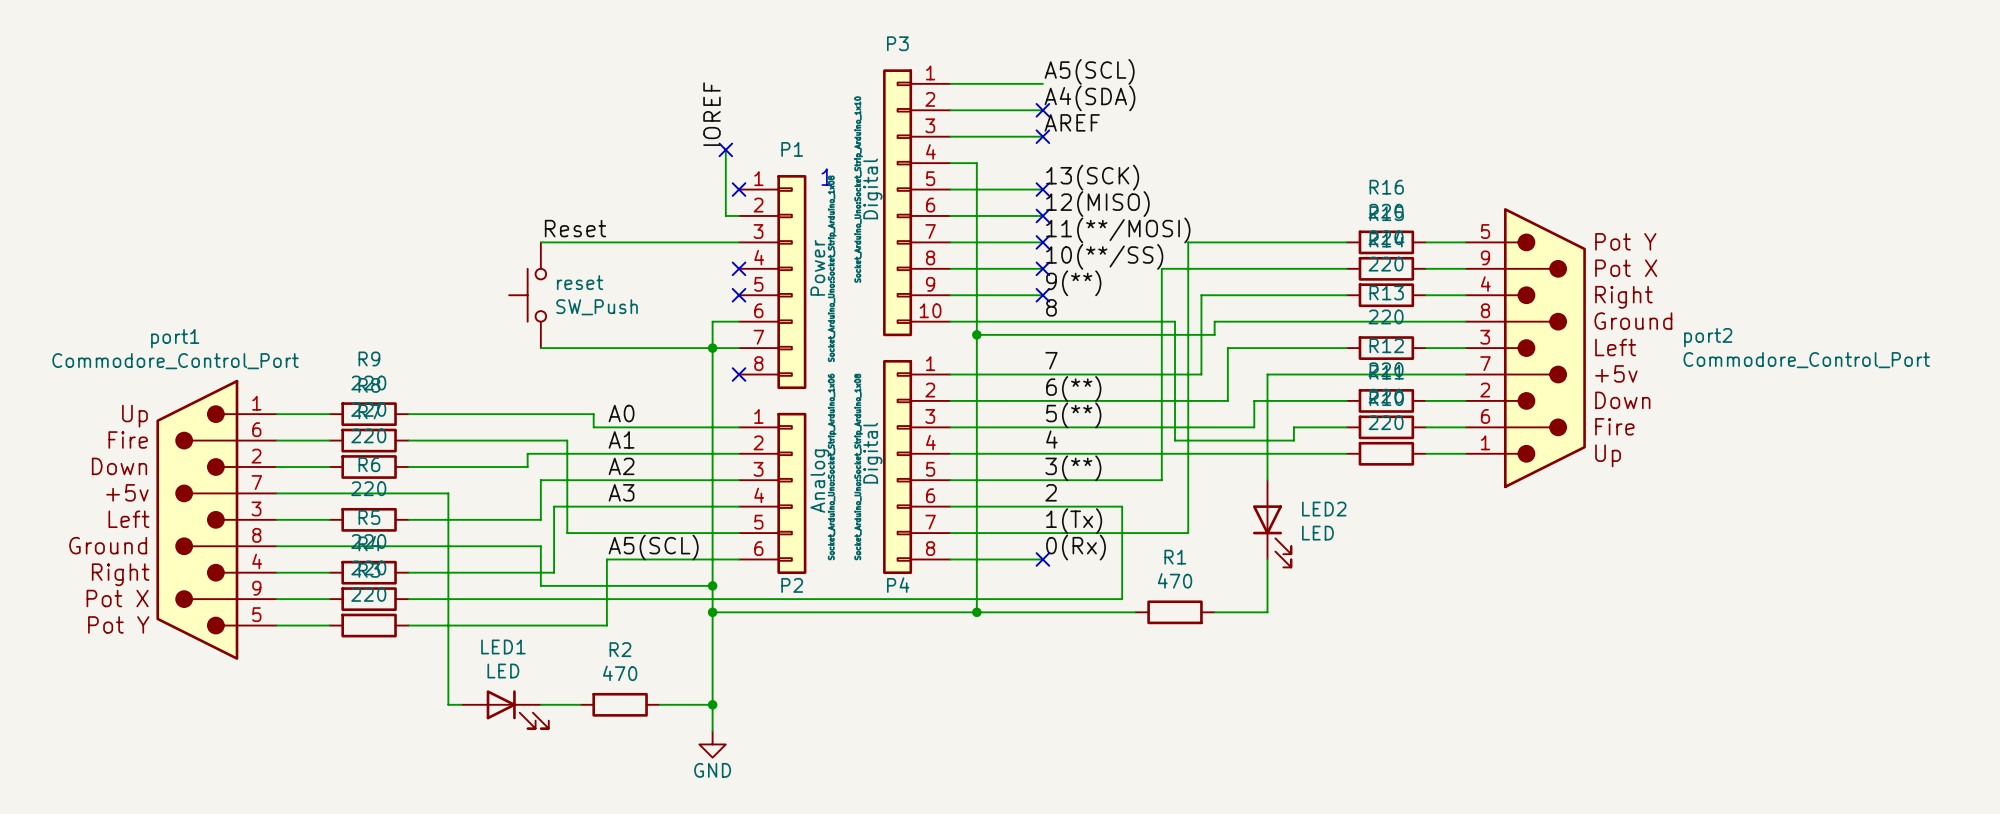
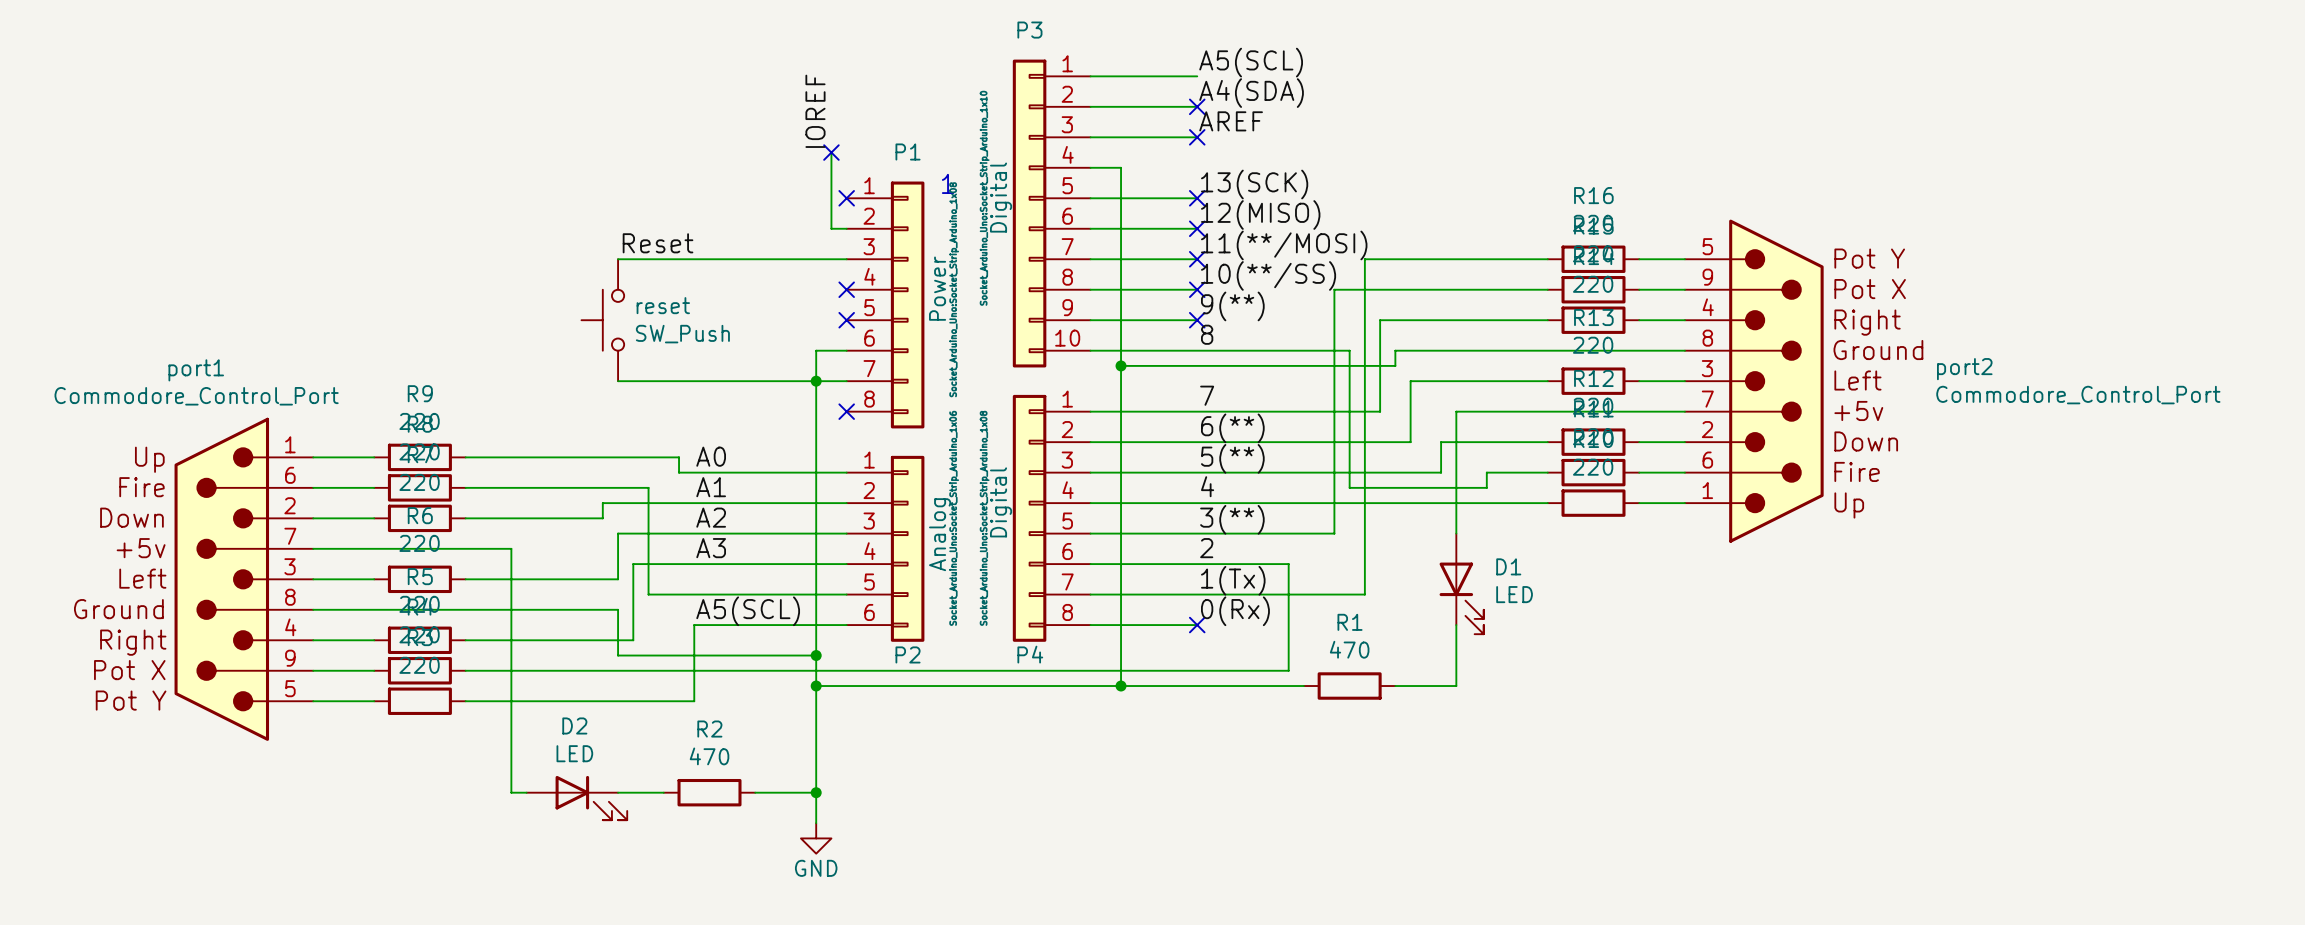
LED2 name: LED2 (1324, 509) -> D1 (1508, 566)
LED1 name: LED1 (503, 646) -> D2 (574, 725)

